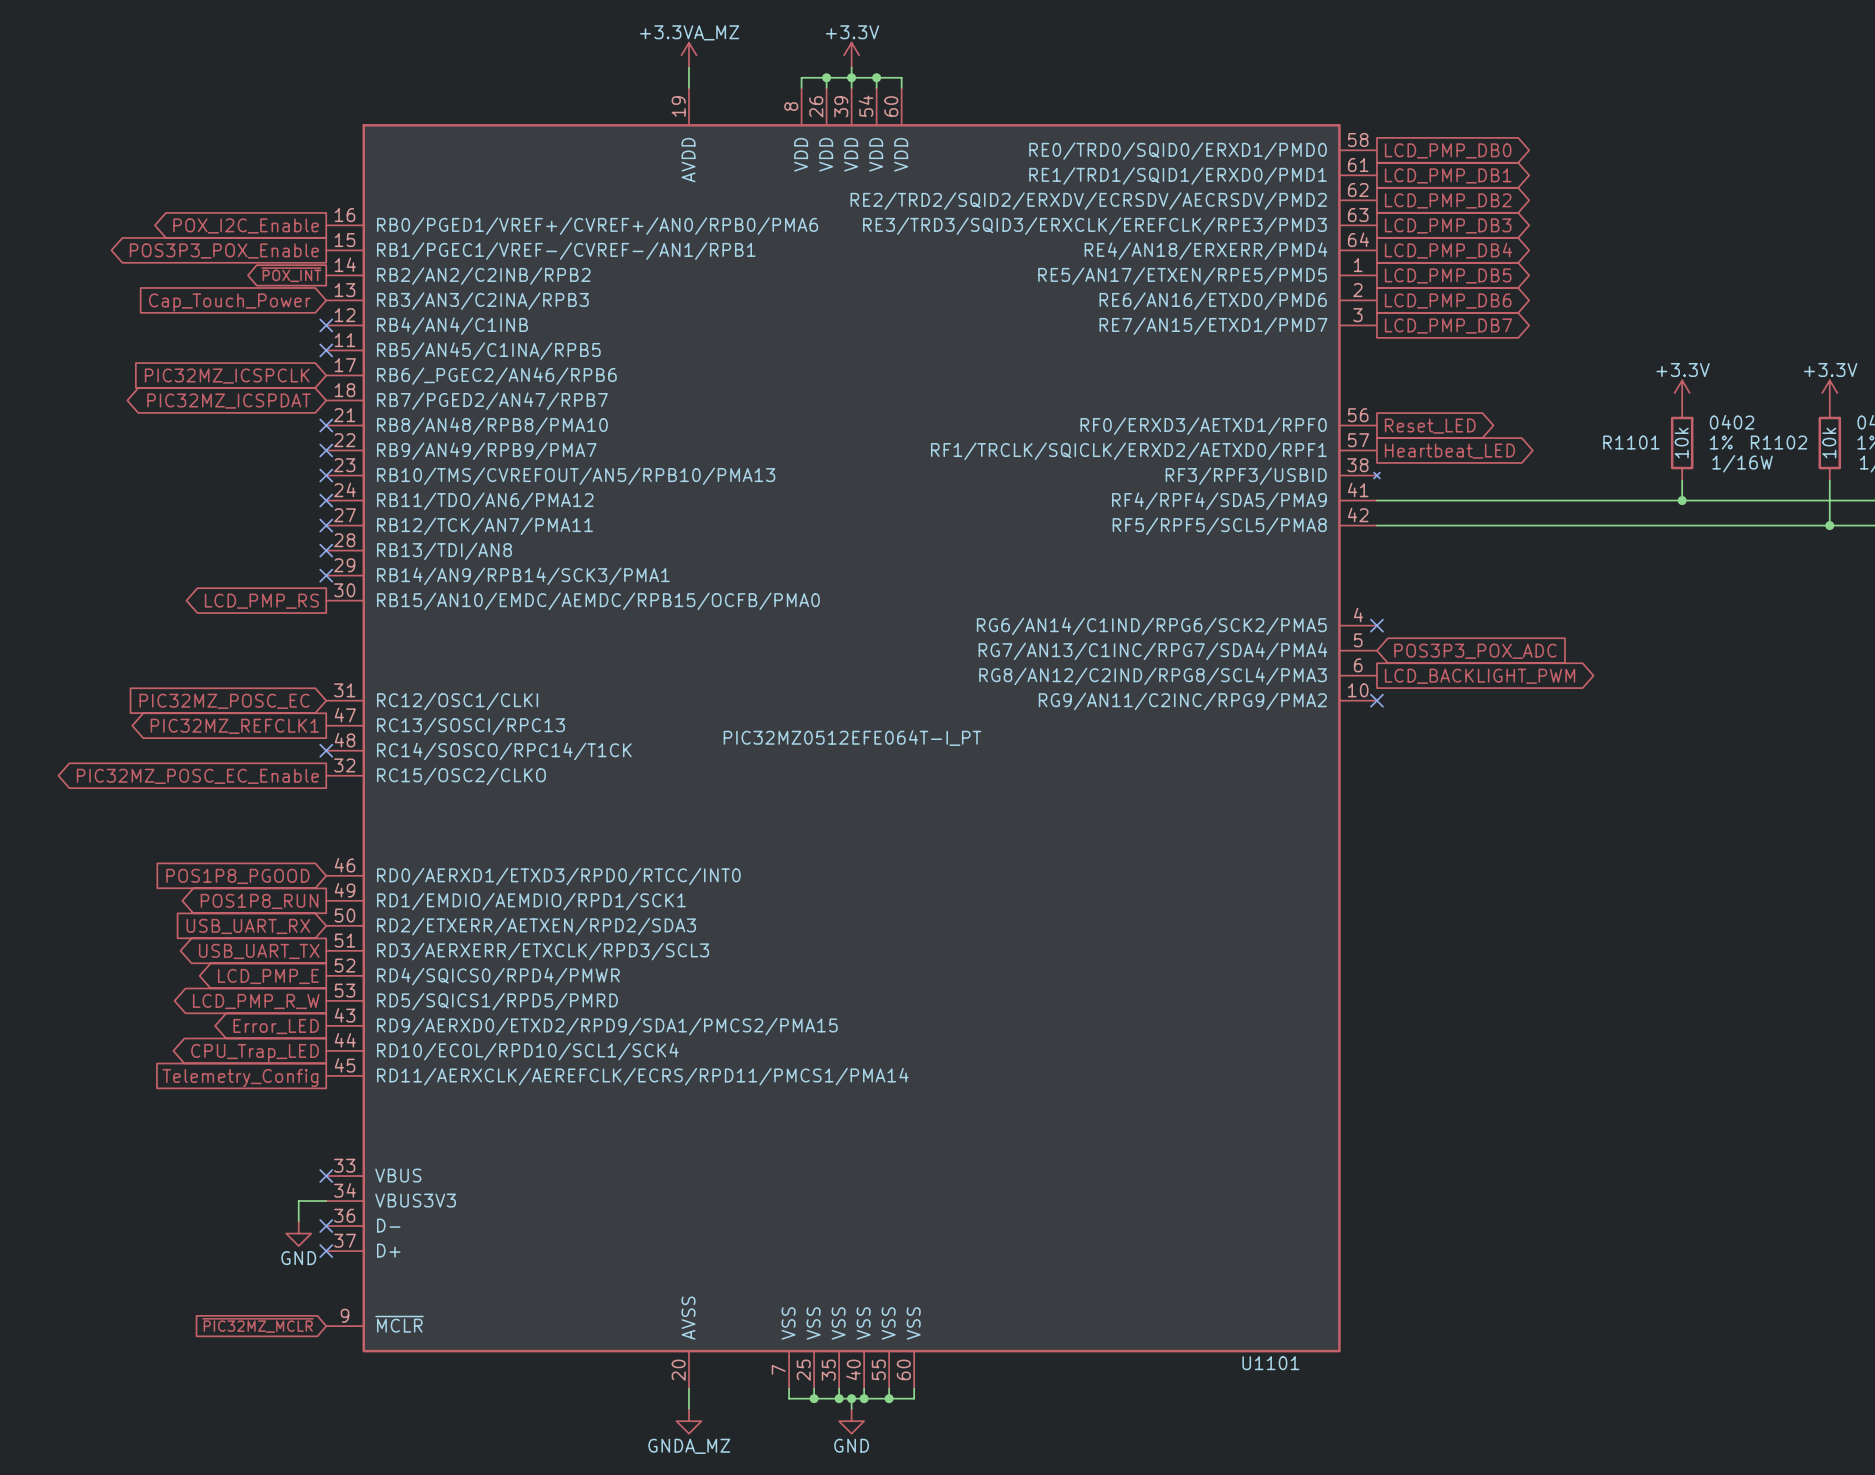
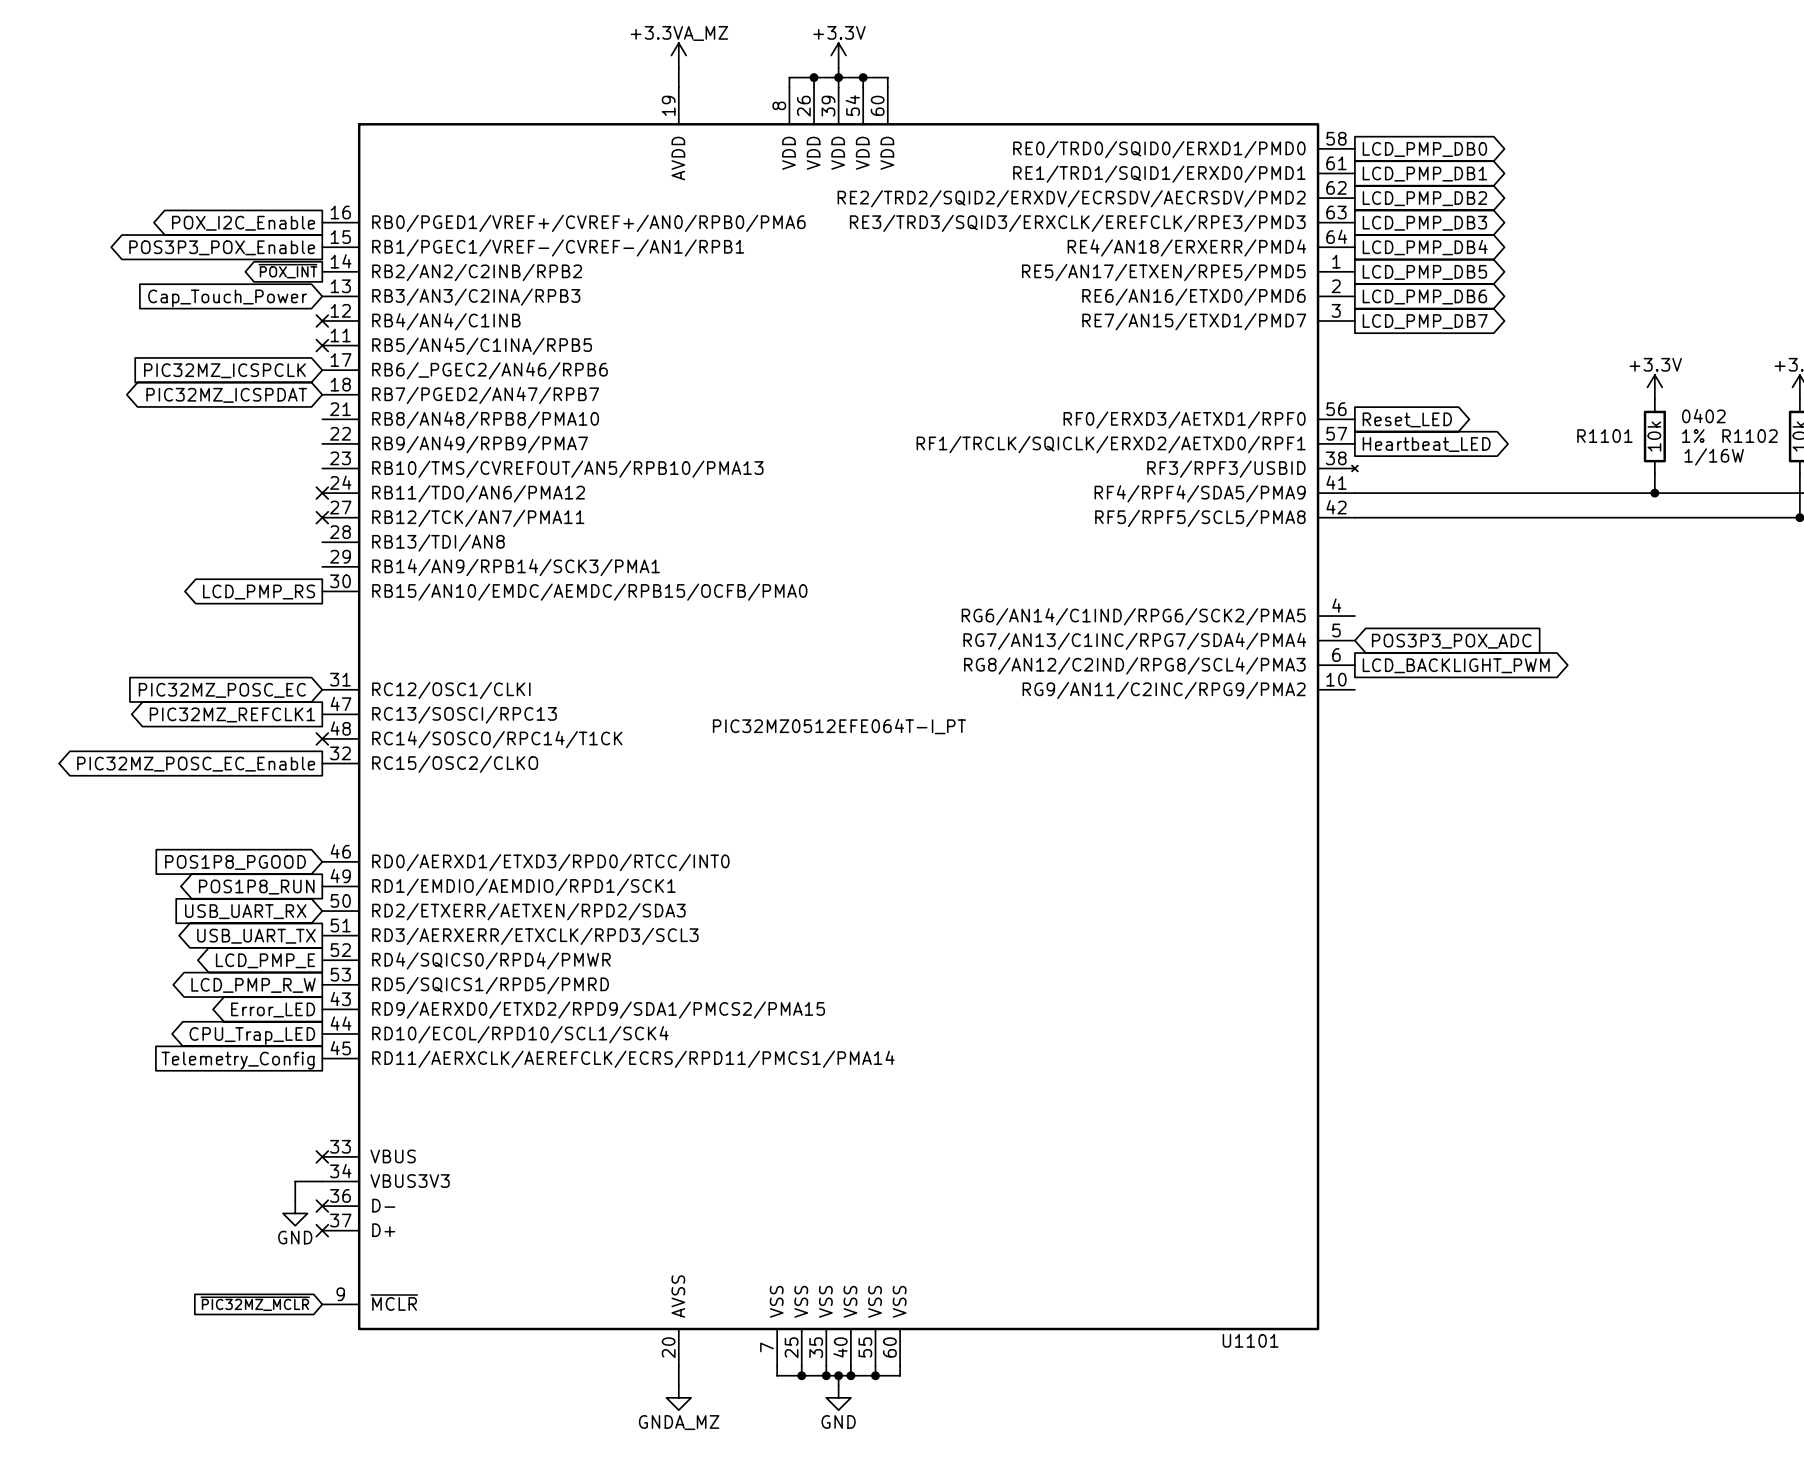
no-connect mark: (326, 425) -> none
no-connect mark: (326, 450) -> none
no-connect mark: (326, 475) -> none
no-connect mark: (326, 550) -> none
no-connect mark: (326, 575) -> none
no-connect mark: (1376, 625) -> none
no-connect mark: (1376, 700) -> none

